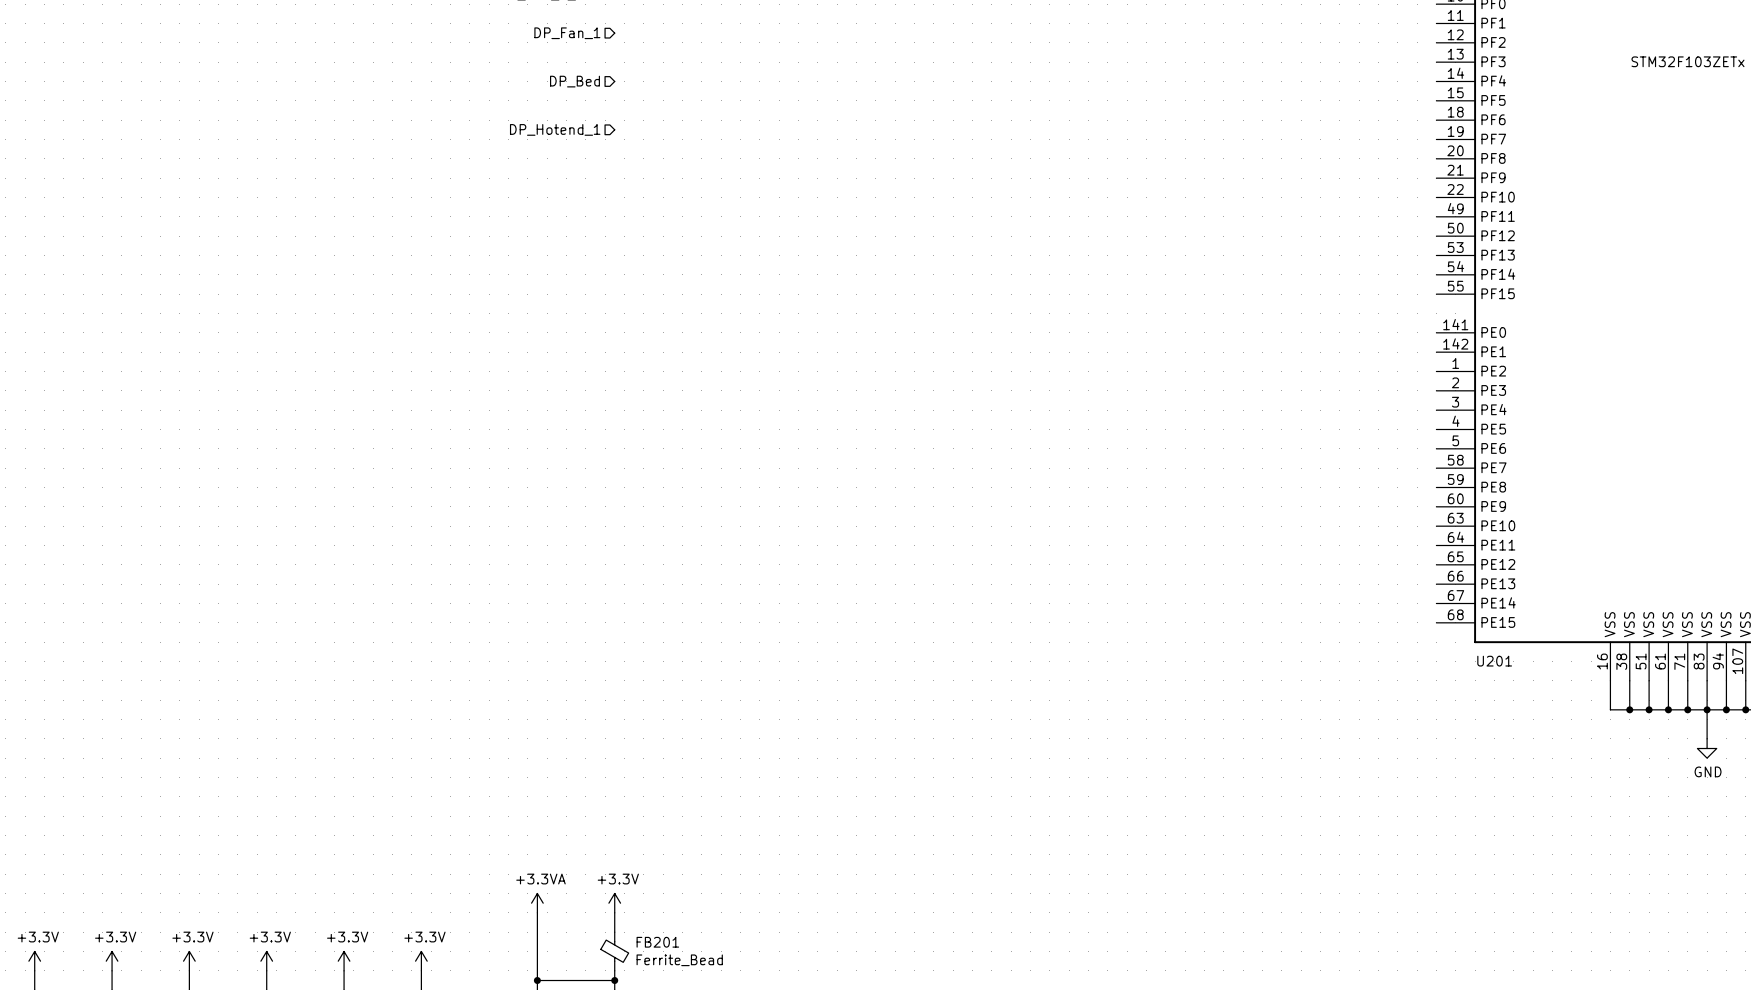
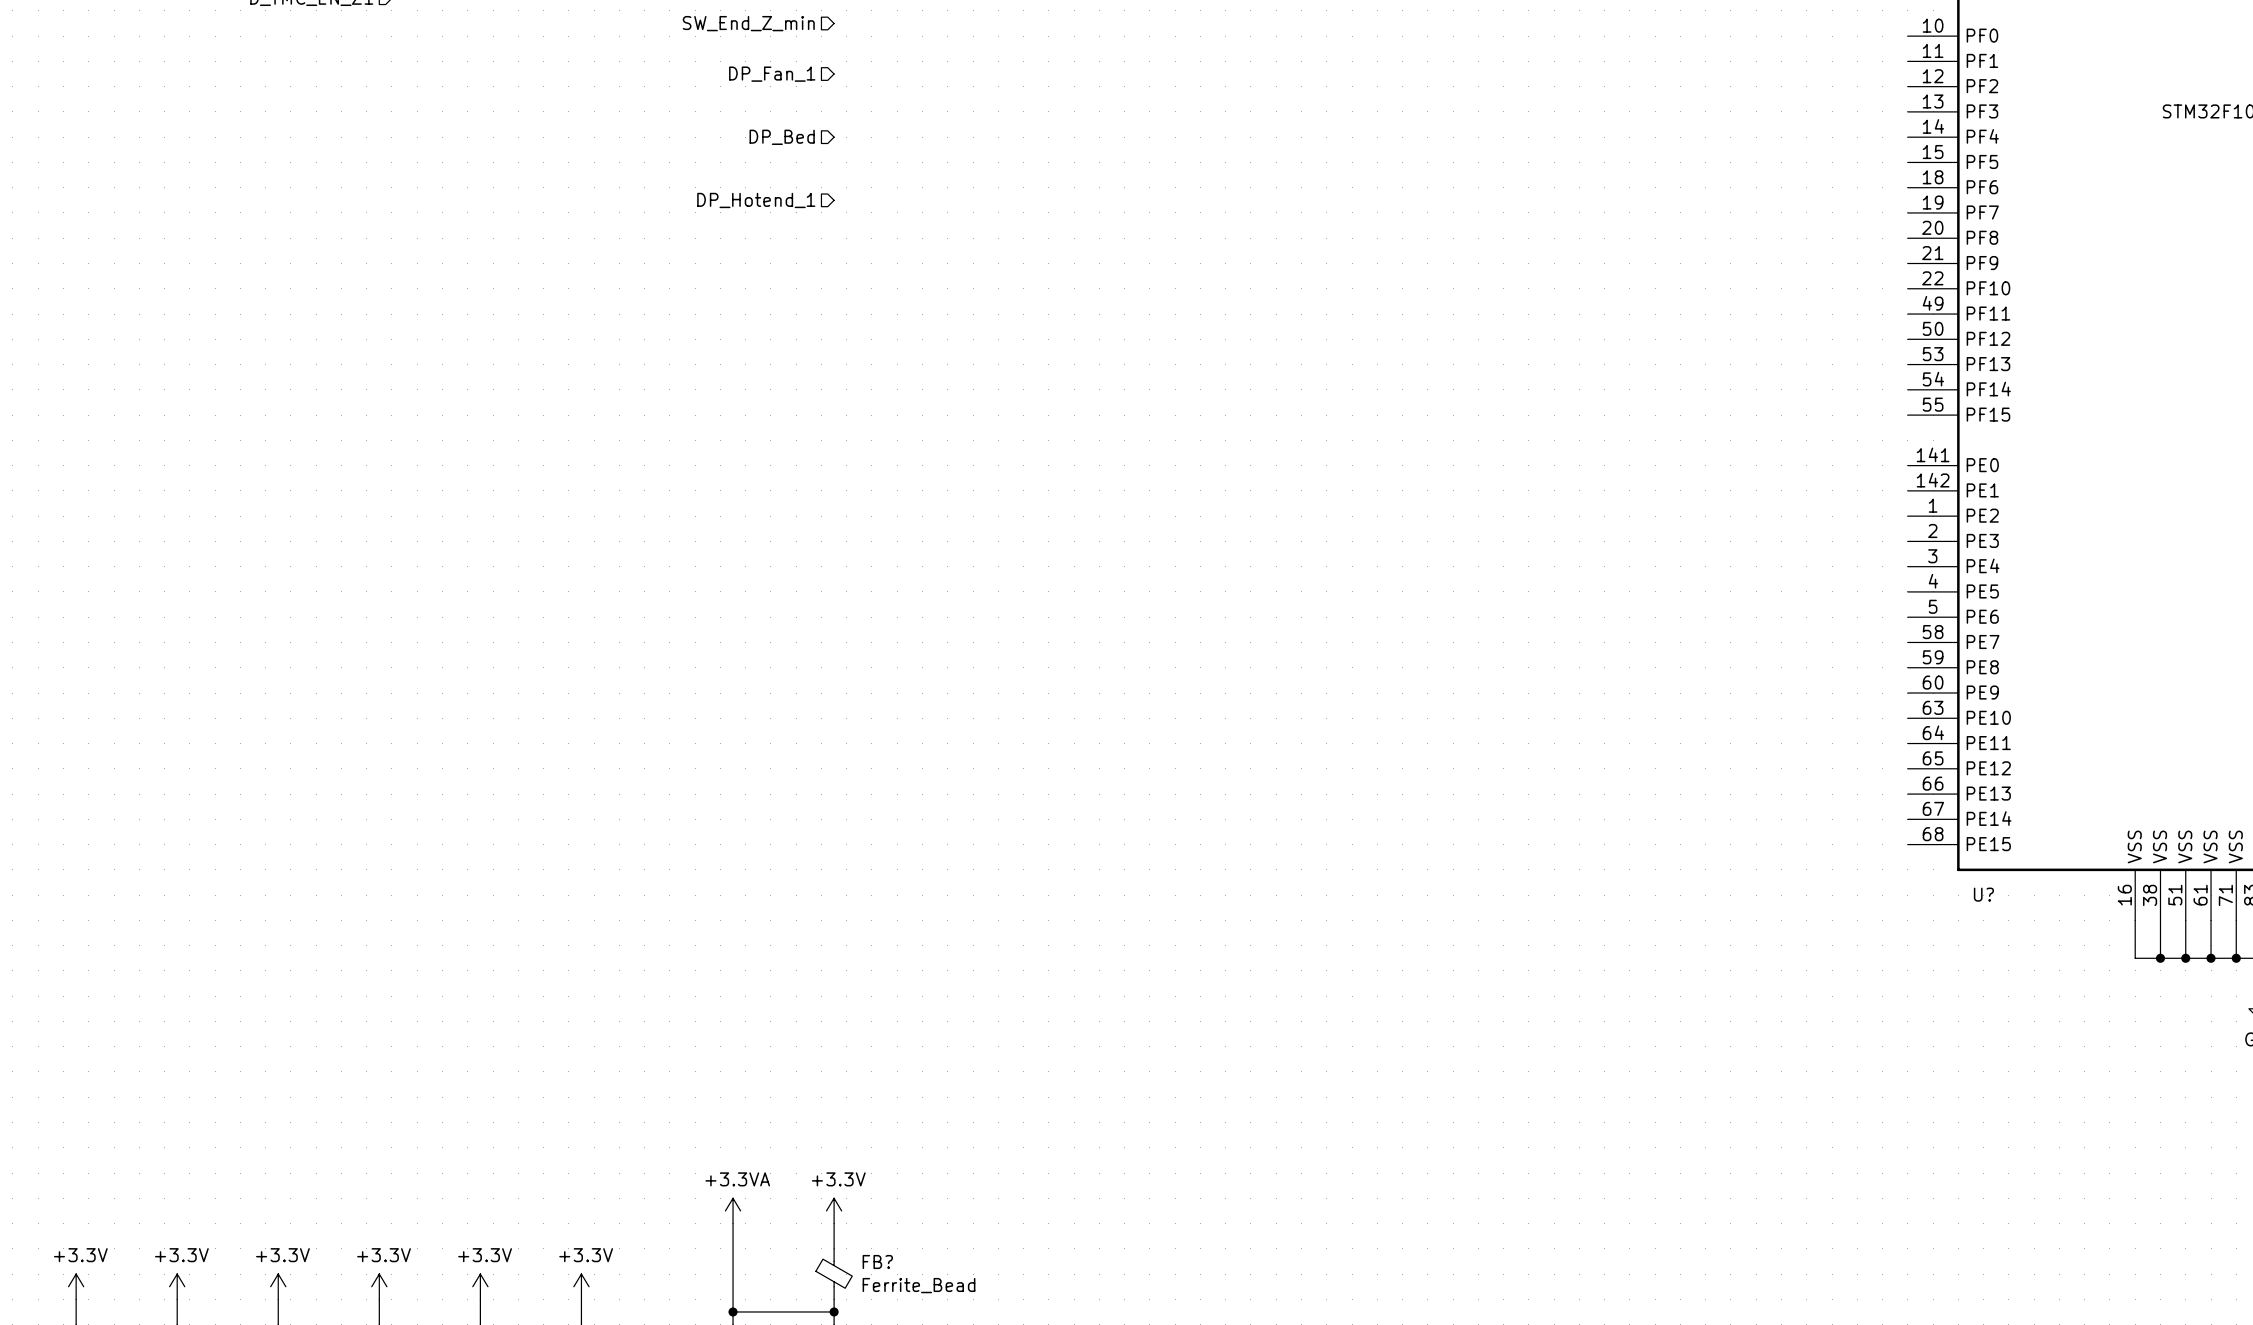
U201 name: U201 (1494, 661) -> U? (1983, 894)
FB201 name: FB201 (657, 942) -> FB? (877, 1261)

